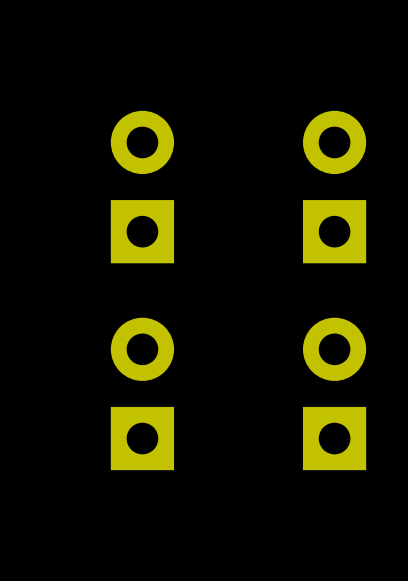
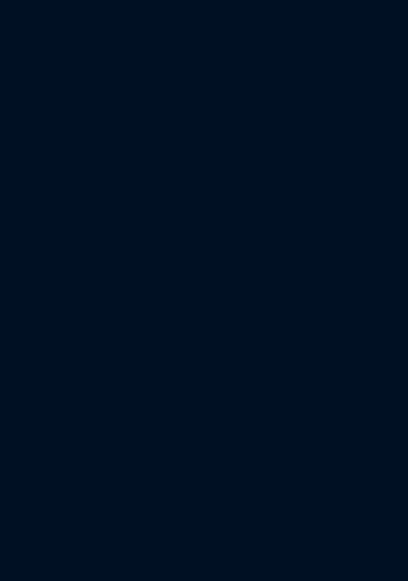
part: (142, 187) -> none
part: (334, 187) -> none
part: (142, 393) -> none
part: (334, 393) -> none

